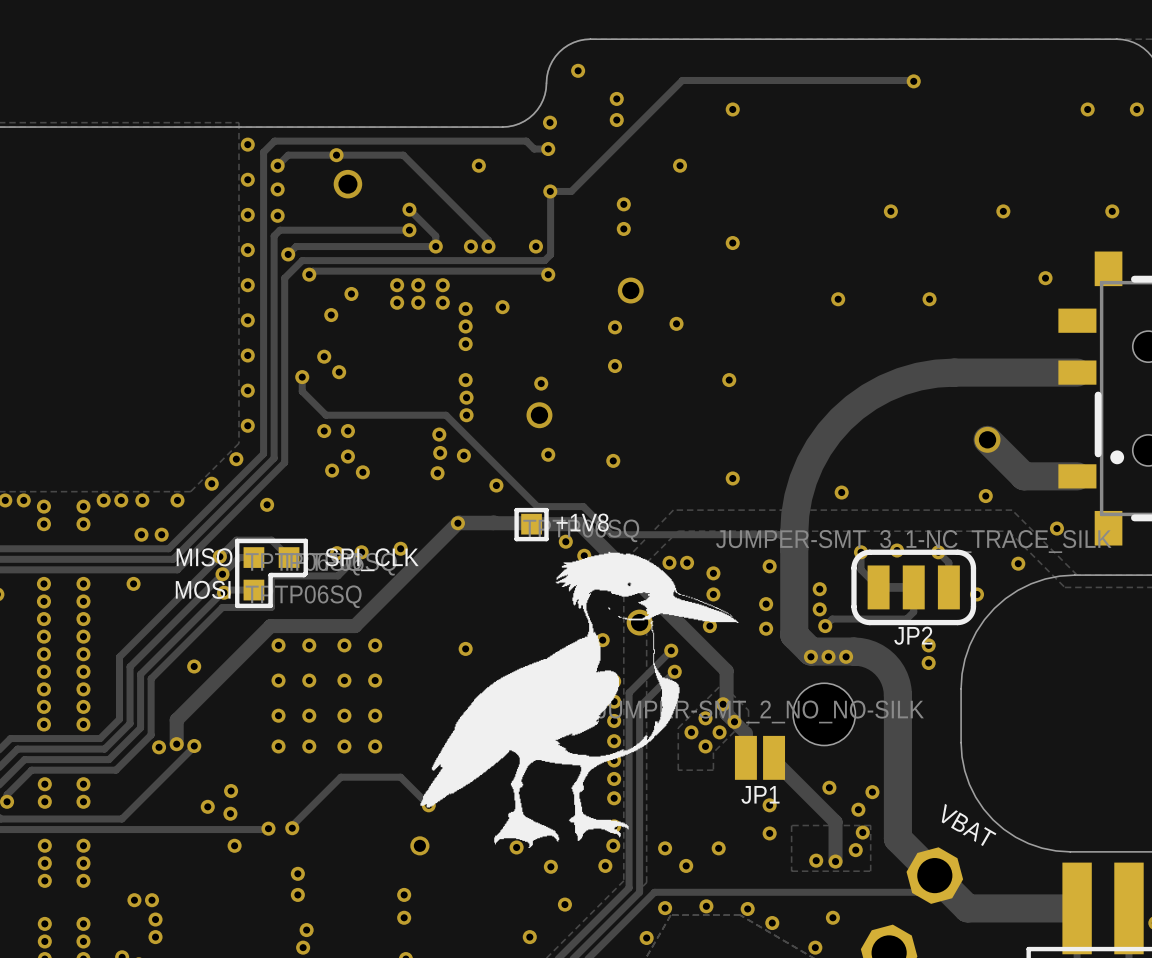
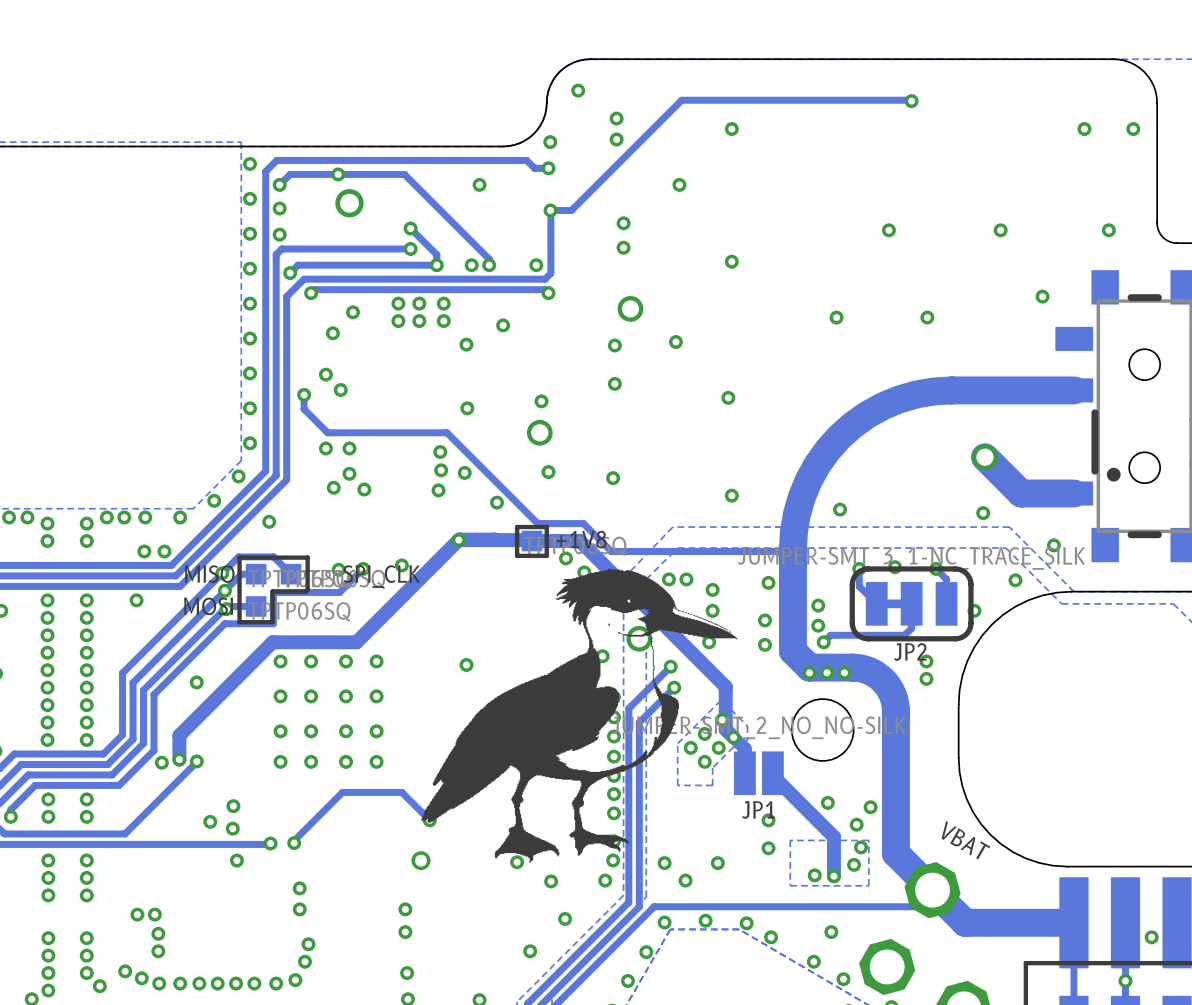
via: (465, 308) -> none
via: (465, 344) -> none
via: (465, 380) -> none
via: none -> (467, 408)
via: (466, 397) -> none
via: (466, 415) -> none

